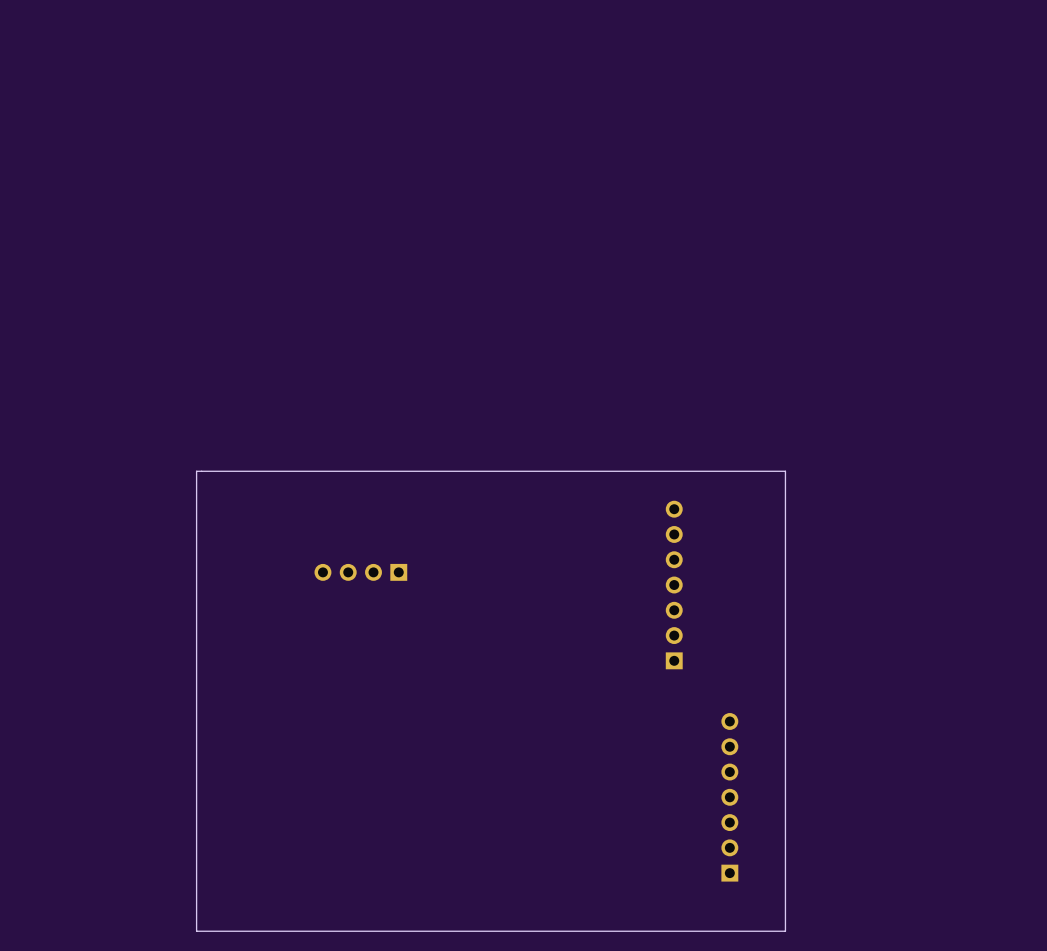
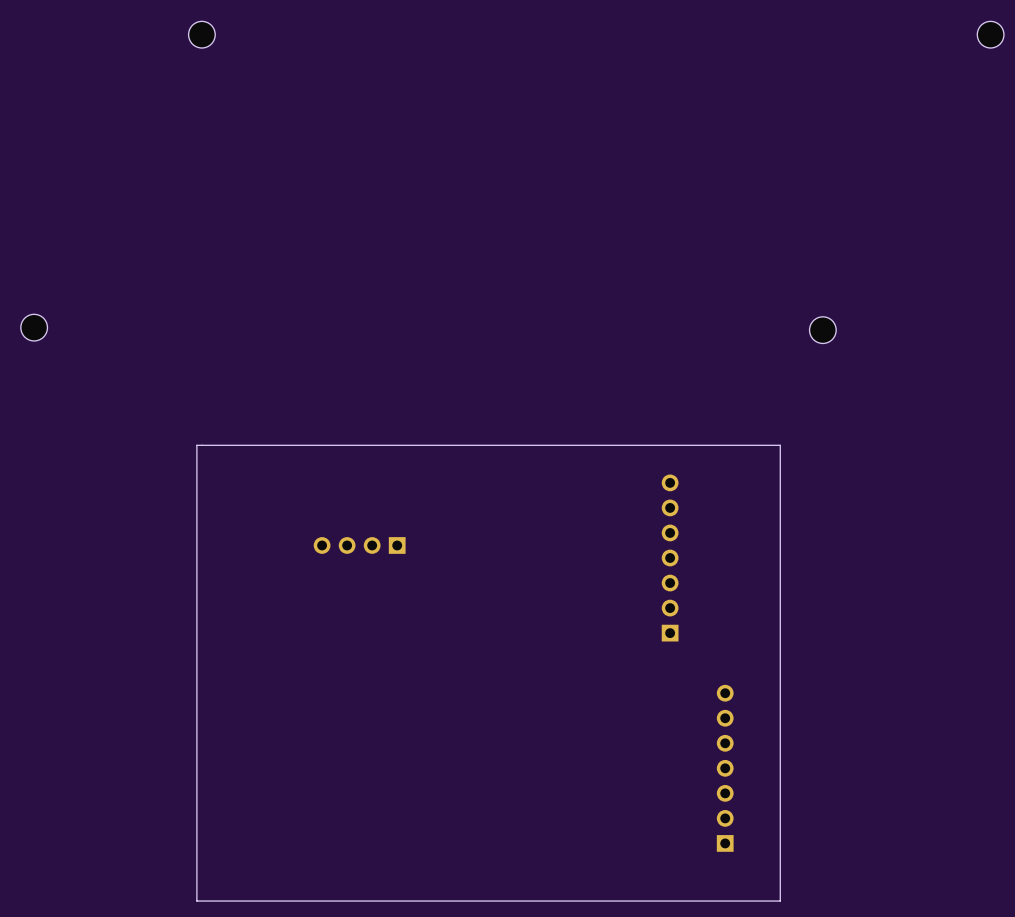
part: none -> (201, 34)
part: none -> (990, 34)
part: none -> (34, 327)
part: none -> (822, 330)

